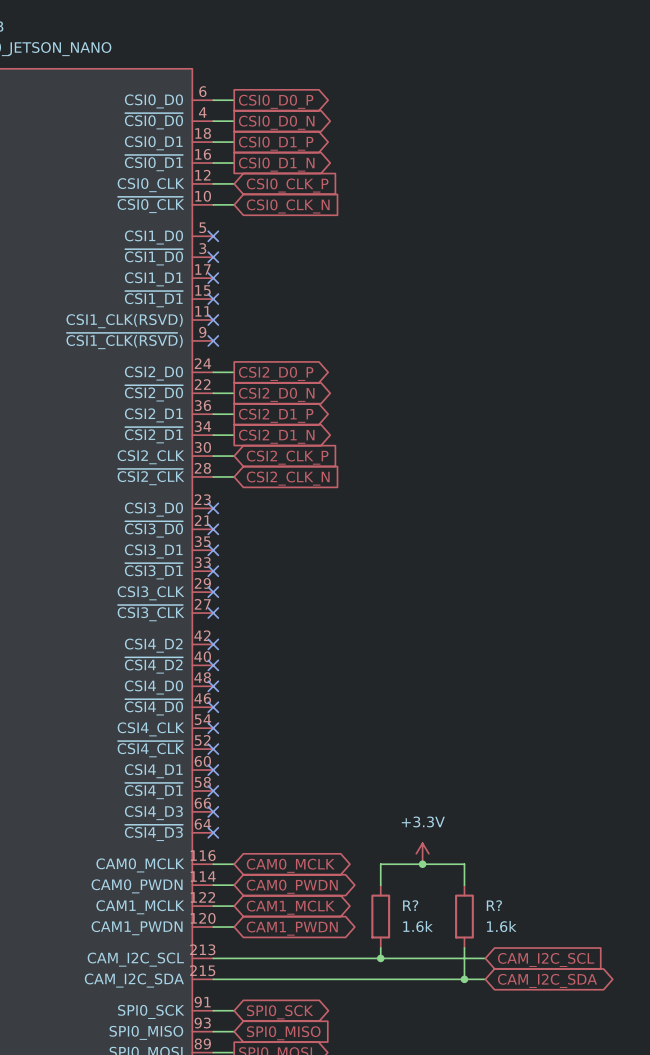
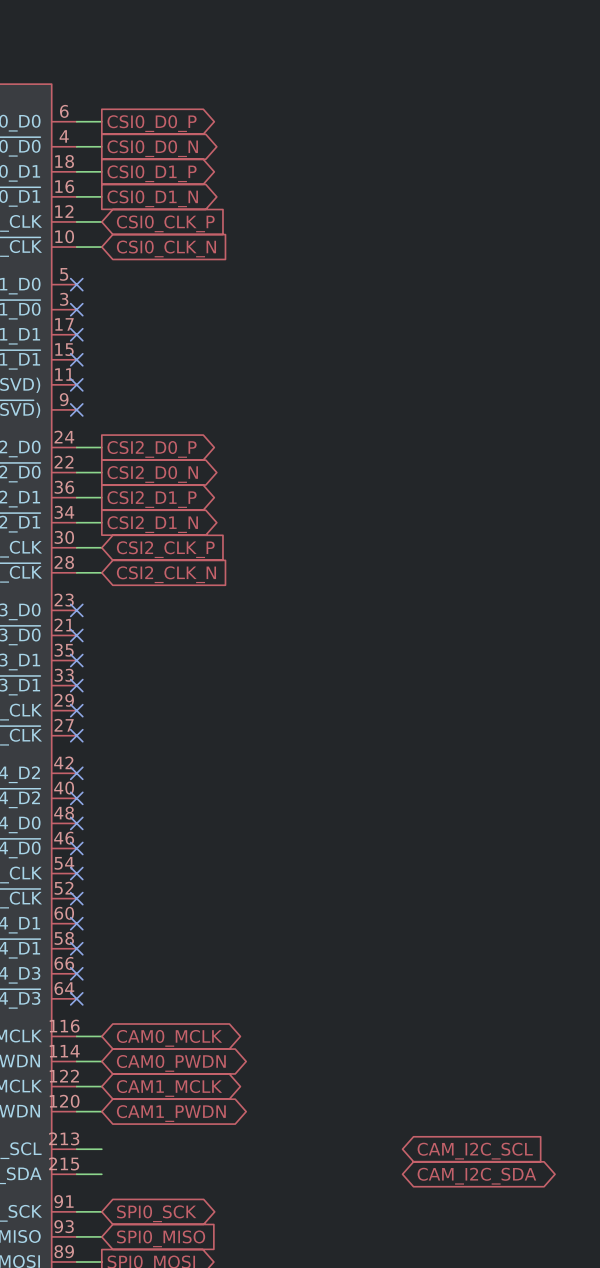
power symbol: +3.3V (422, 853) -> none
junction: (422, 864) -> none
wire: (380, 885) (380, 864) (464, 864) (464, 885) -> none
R?: 1.6k (380, 916) -> none
R?: 1.6k (464, 916) -> none
wire: (380, 947) (380, 958) -> none
wire: (464, 947) (464, 979) -> none
wire: (234, 958) (485, 958) -> none
junction: (380, 958) -> none
wire: (234, 979) (485, 979) -> none
junction: (464, 979) -> none

